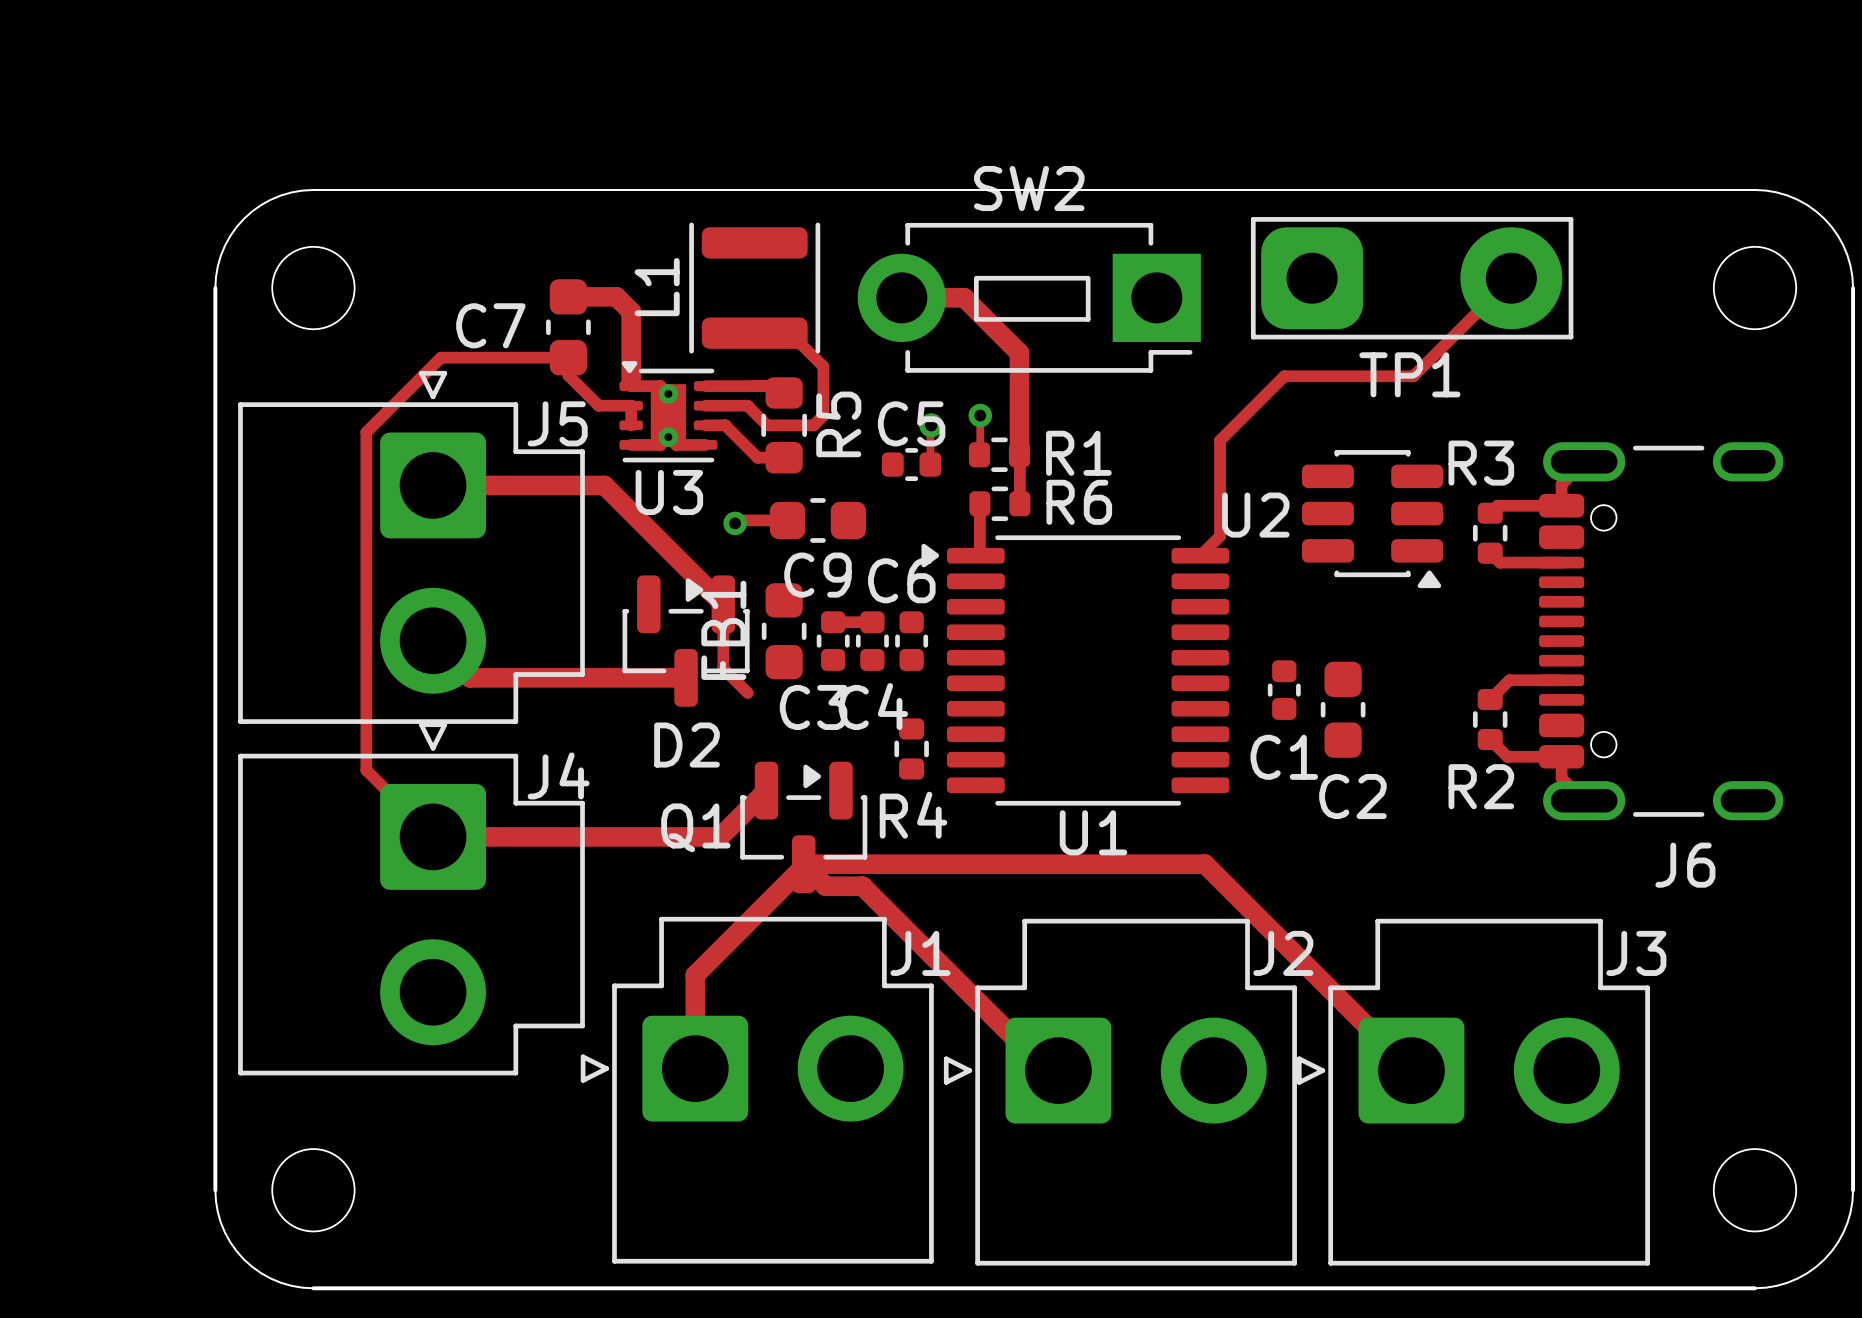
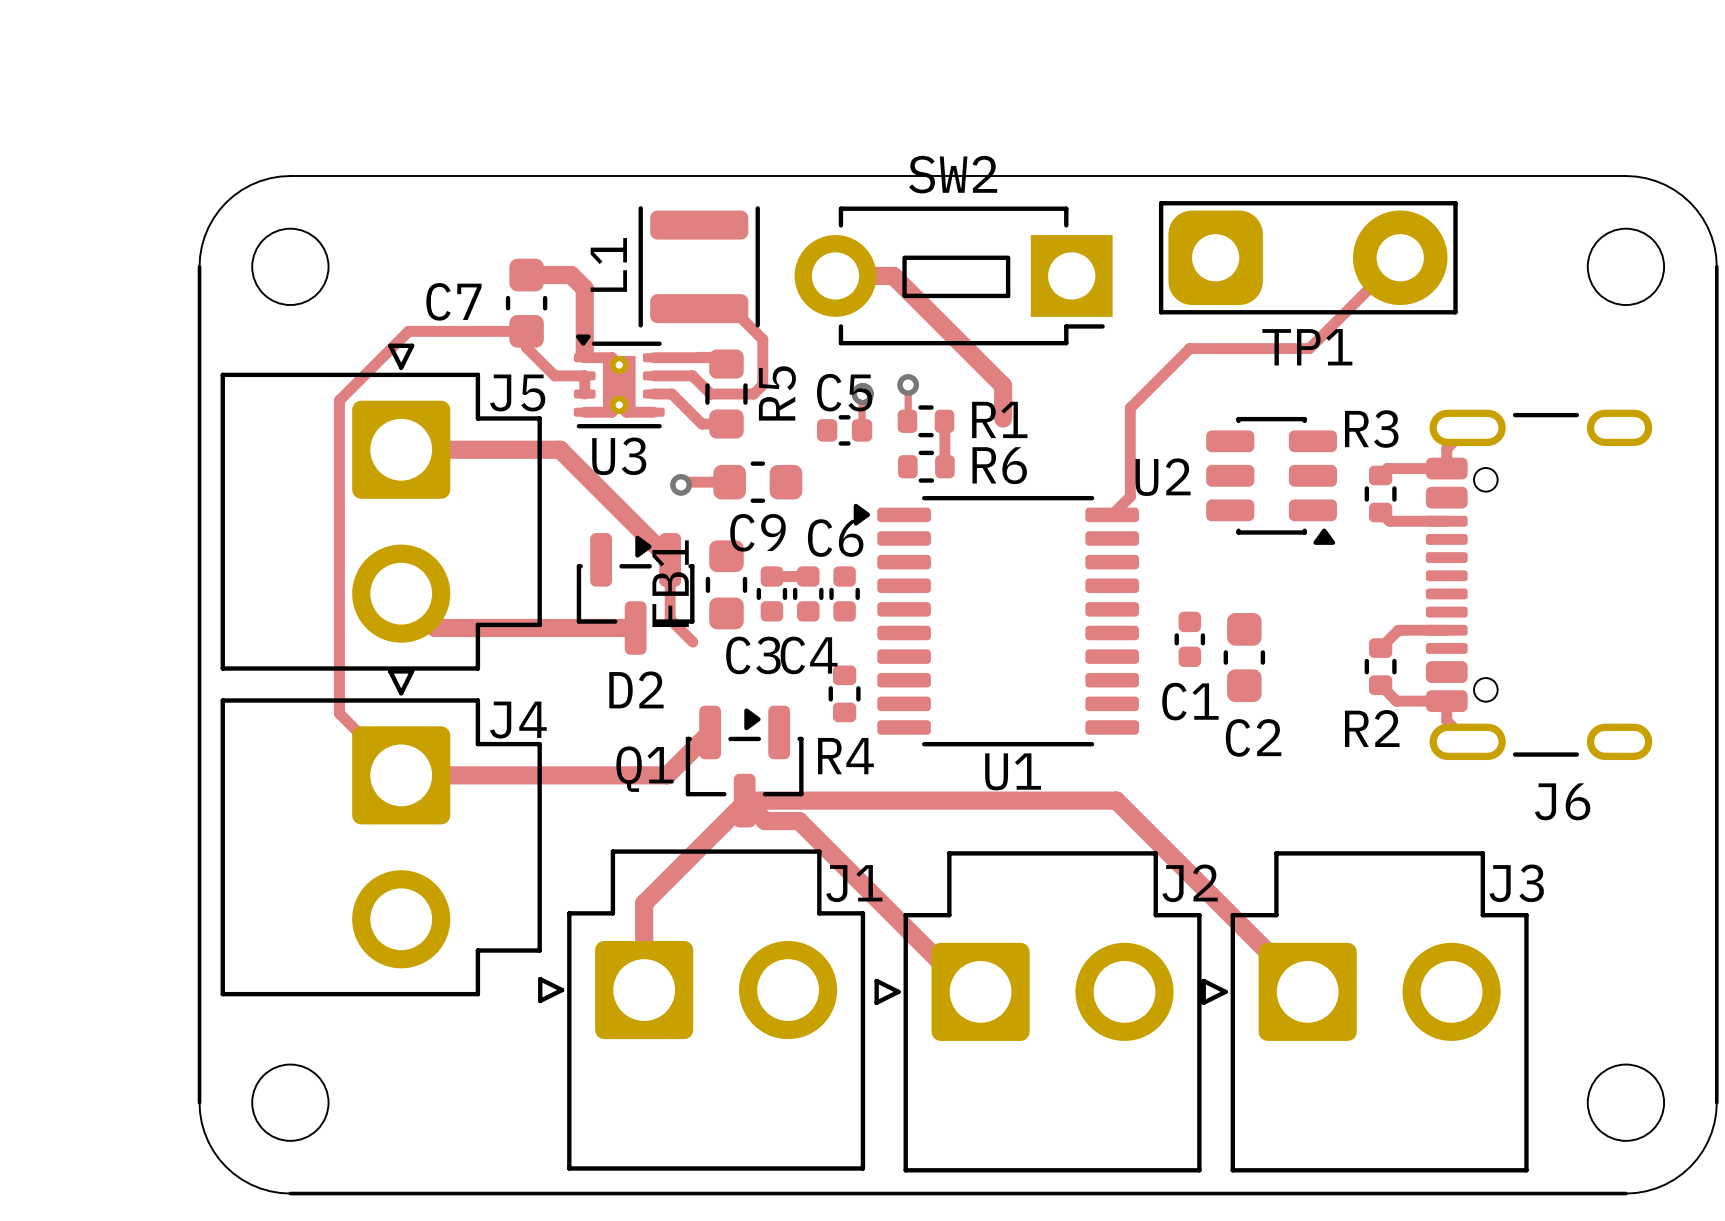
track: (1019, 353) (1019, 454) -> (944, 327) (1003, 385) (1003, 418)
track: (979, 503) (979, 551) (975, 555) -> none

